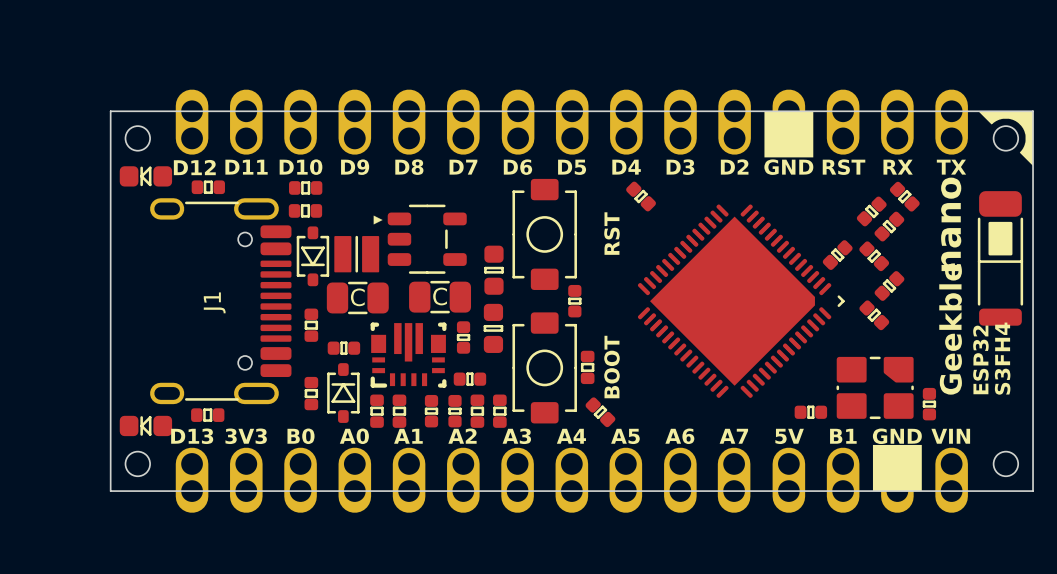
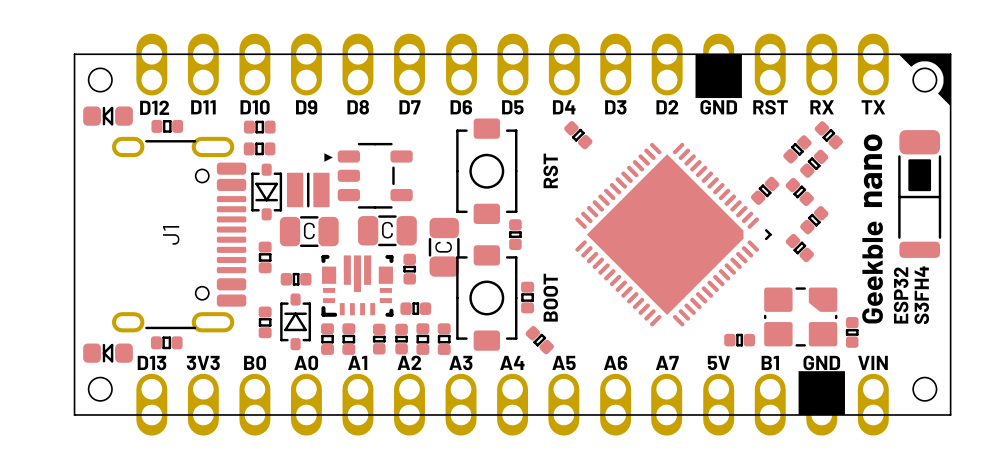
part: (493, 270) -> none
part footprint: [483, 303, 504, 353] -> [428, 217, 460, 277]

